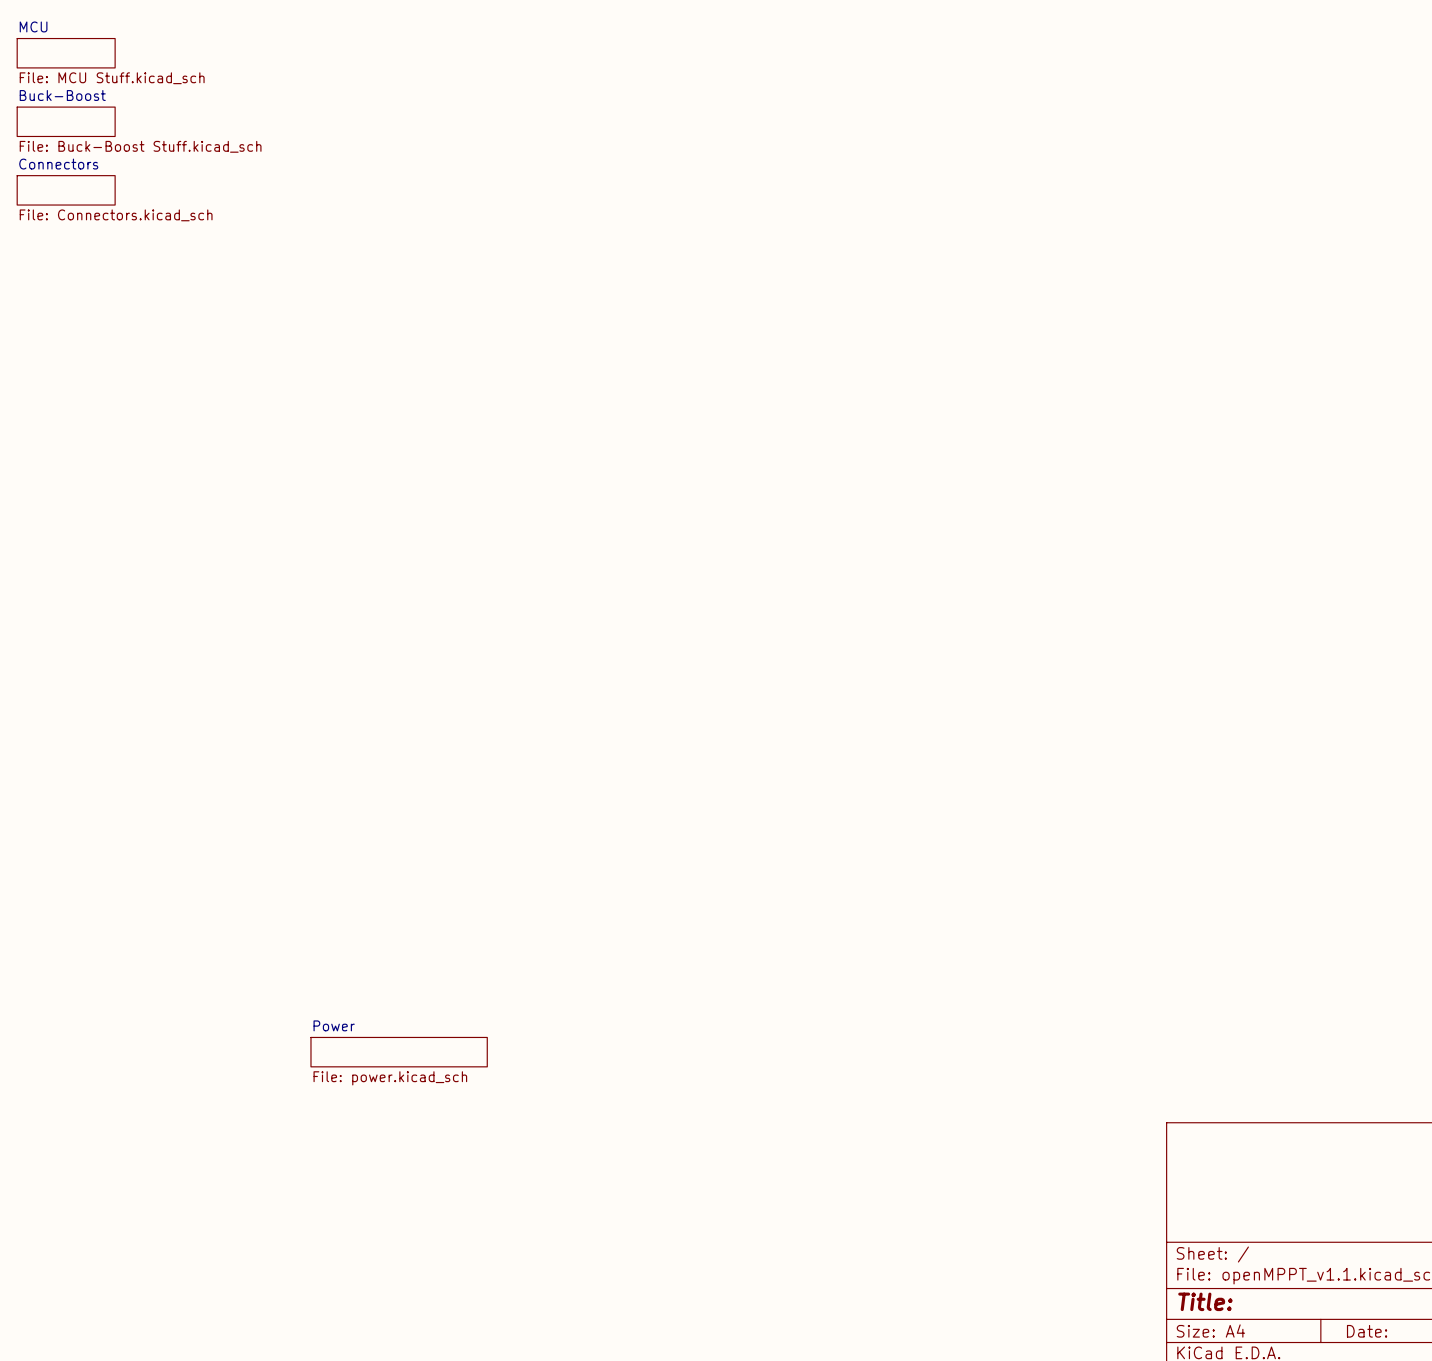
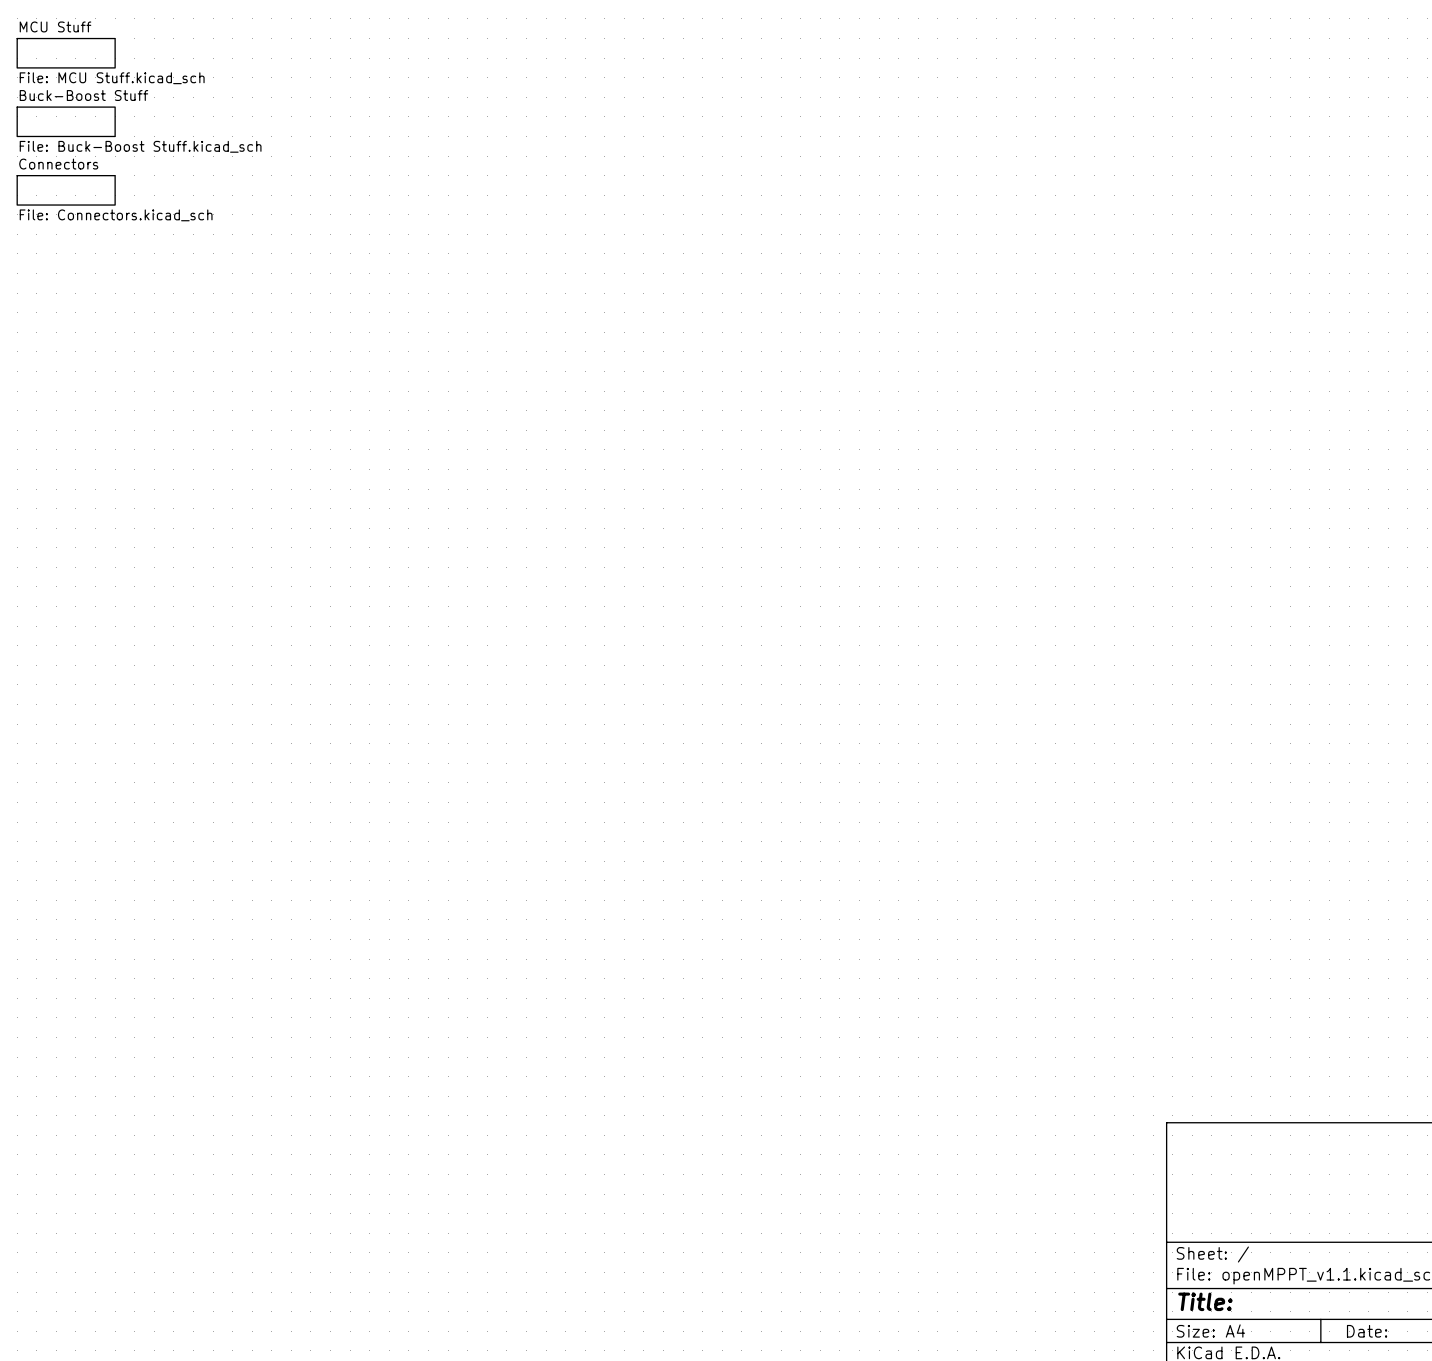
sheet MCU name: MCU (33, 26) -> MCU Stuff (55, 26)
sheet Buck-Boost name: Buck-Boost (62, 95) -> Buck-Boost Stuff (83, 95)
sheet Power: File: power.kicad_sch (399, 1052) -> none

